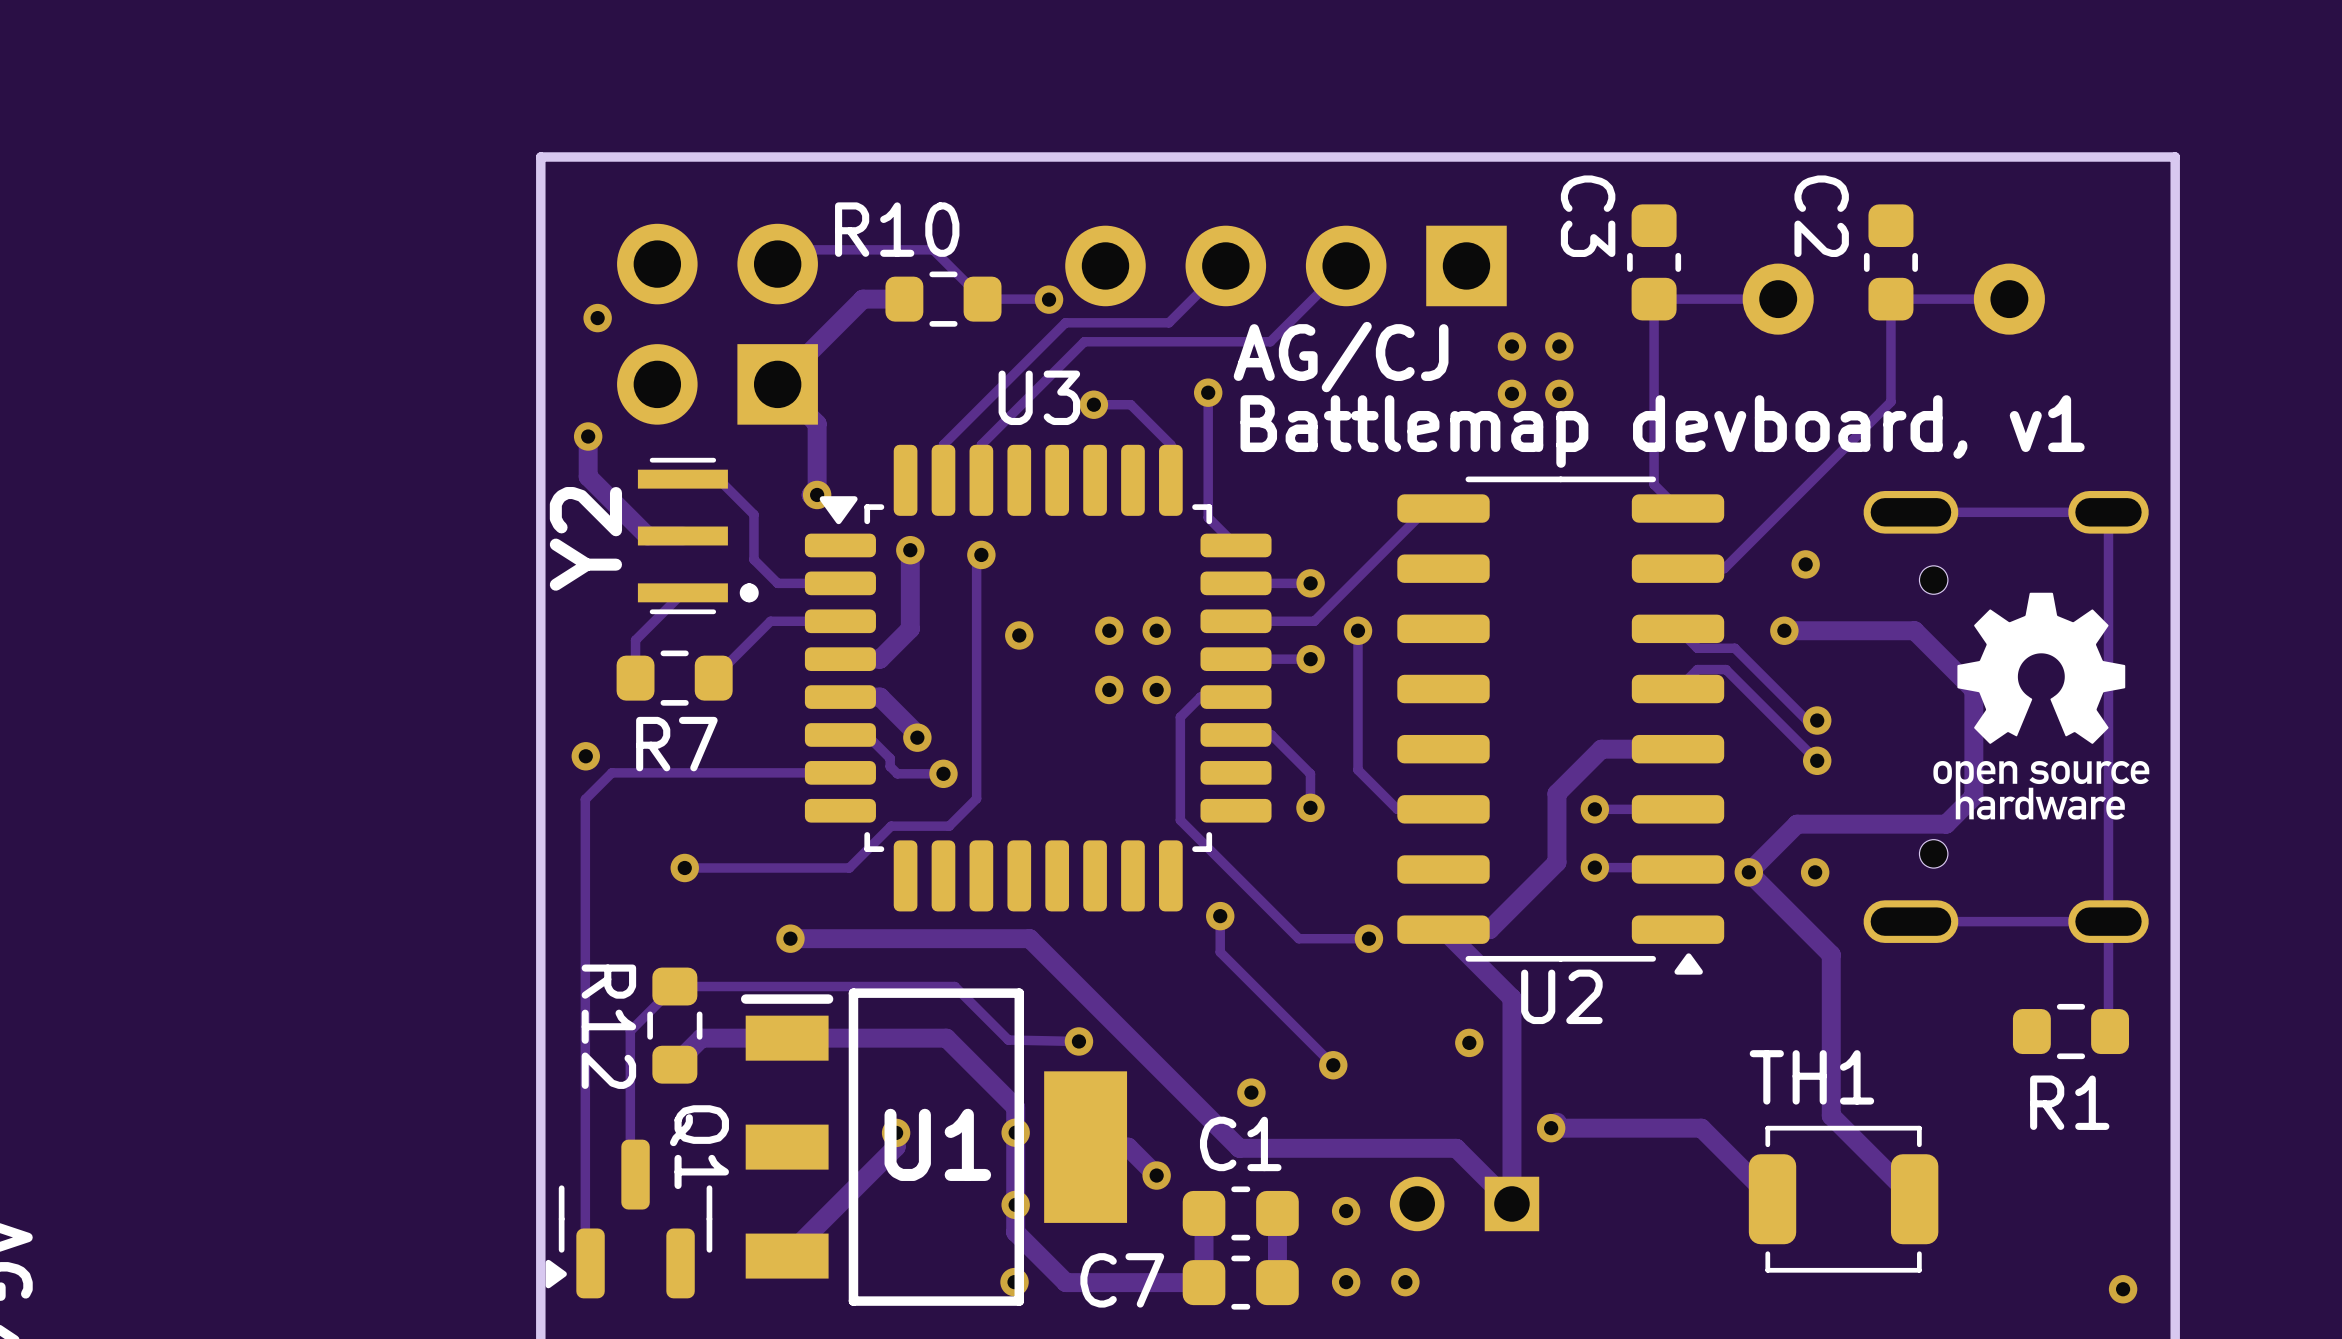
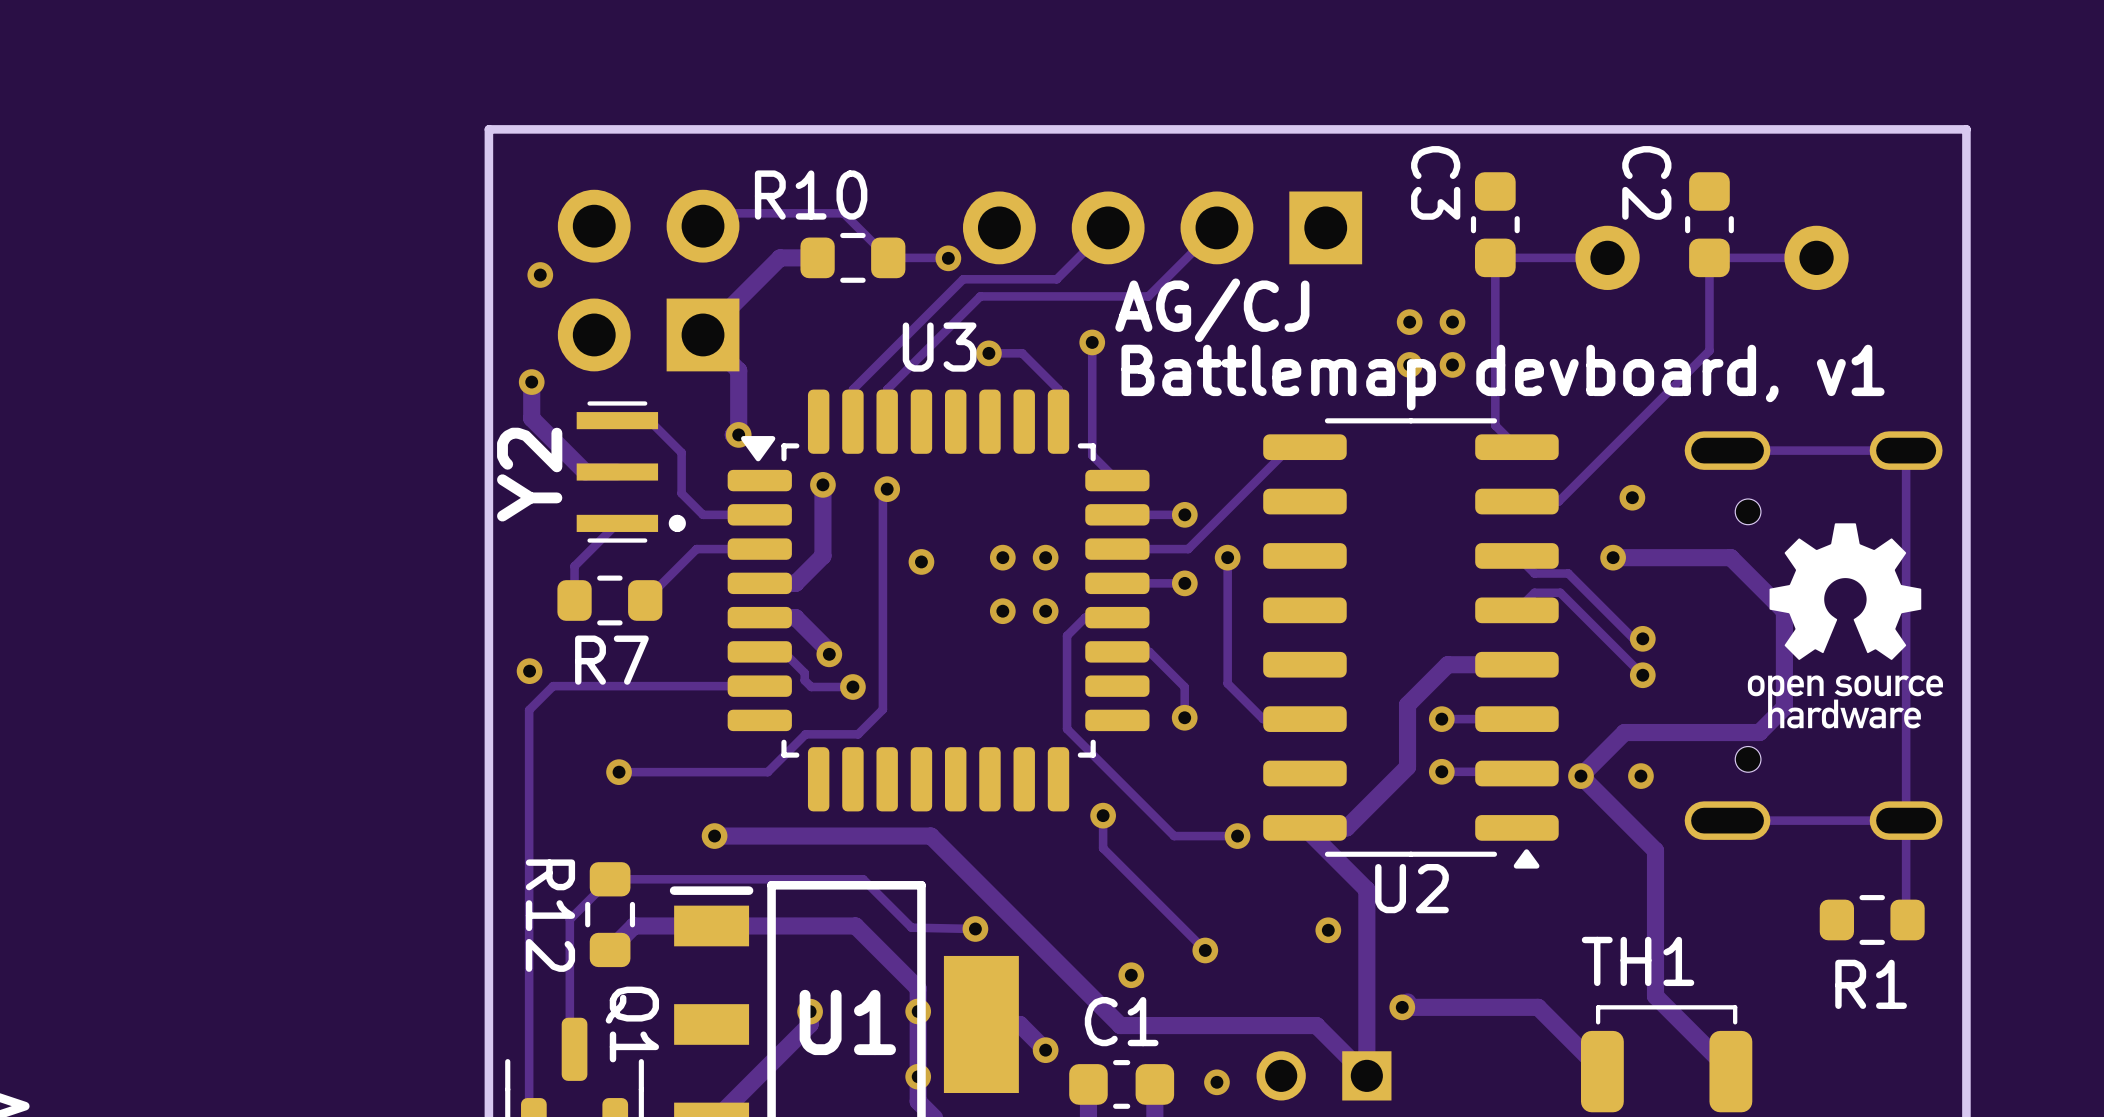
via: (1511, 346) -> none
via: (1559, 346) -> none
via: none -> (1409, 322)
via: none -> (1452, 322)
via: (1511, 393) -> none
via: (1559, 393) -> none
via: none -> (1409, 364)
via: none -> (1452, 364)

